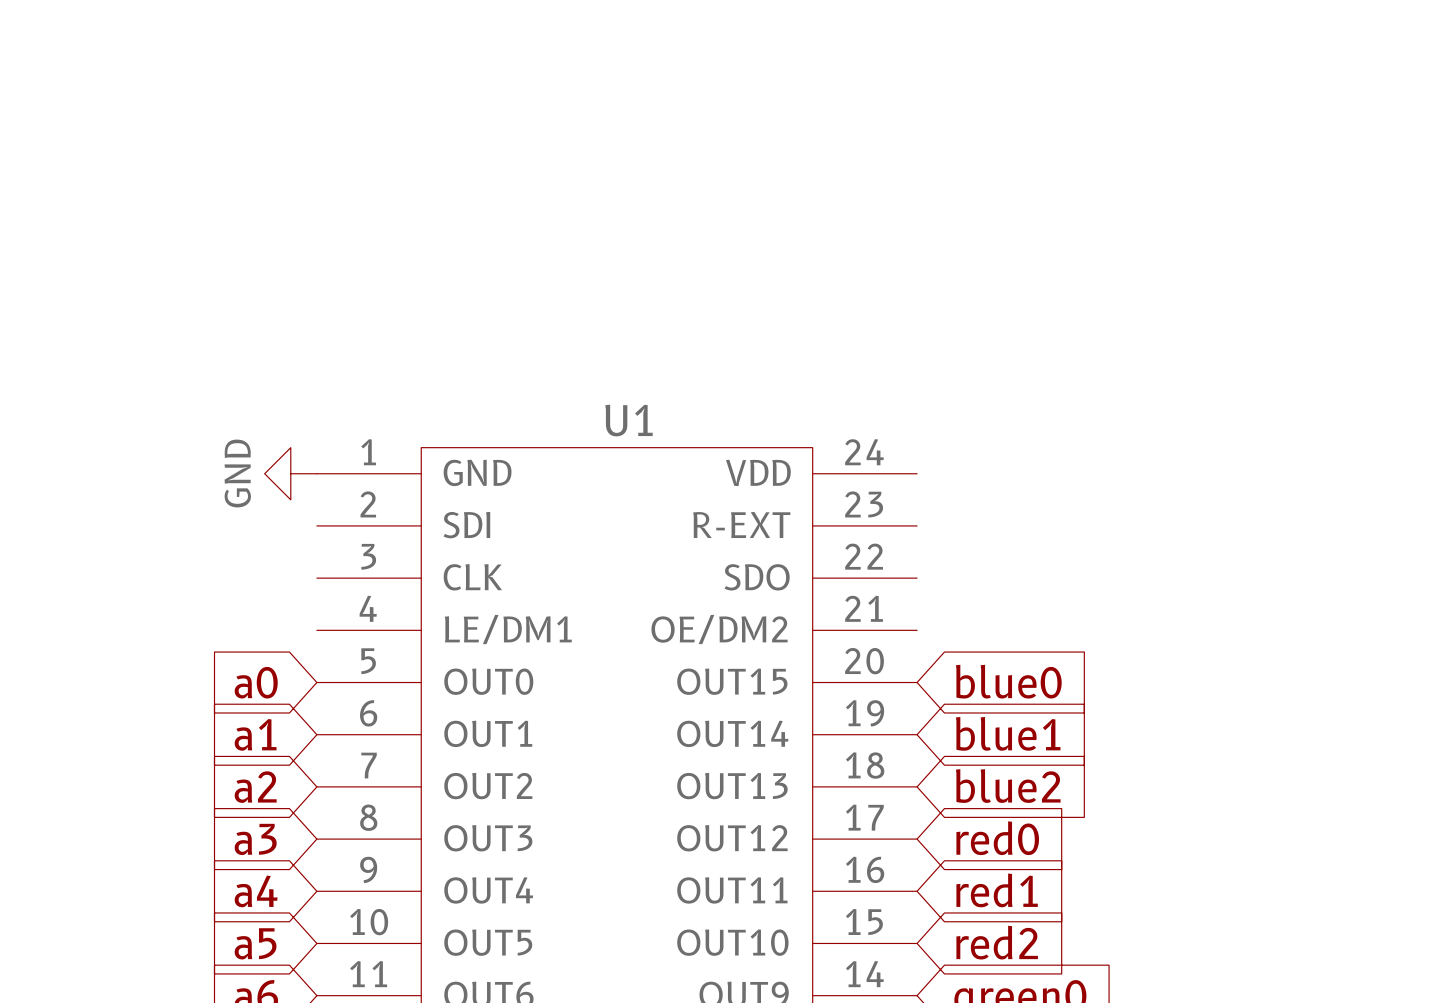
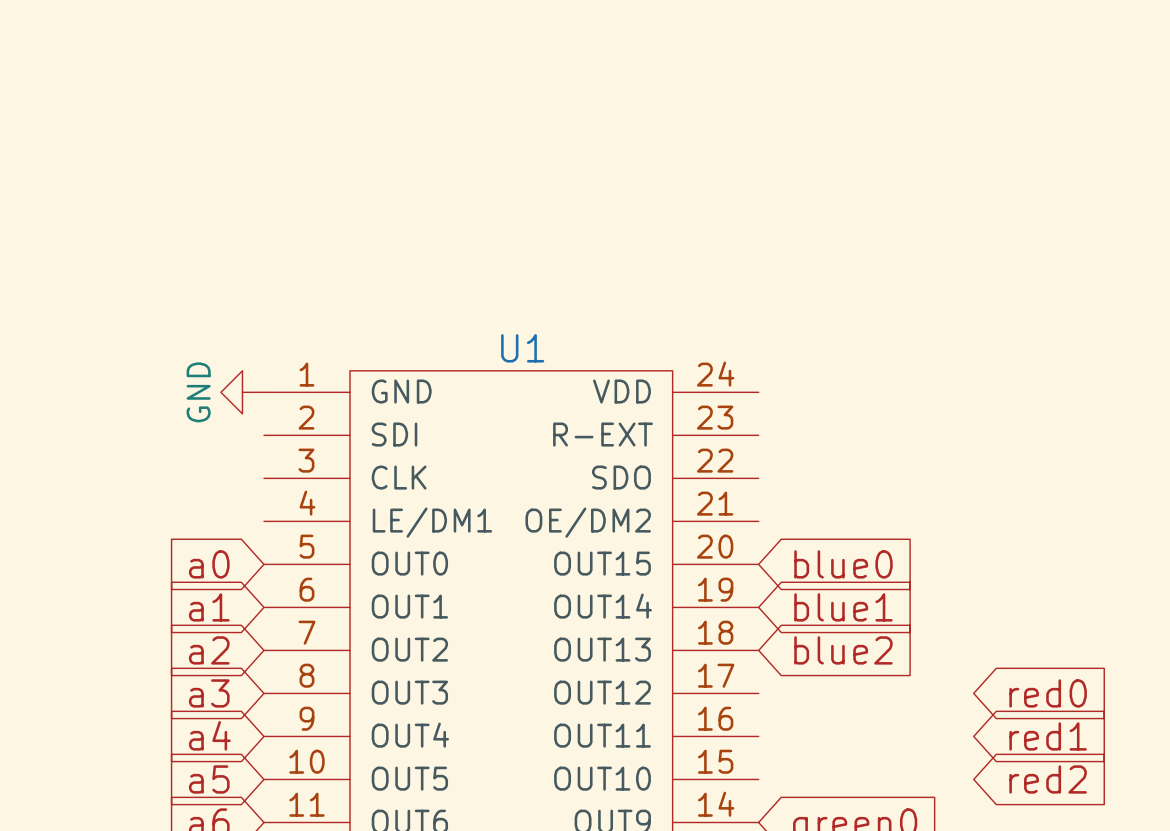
global label position: red0 (997, 838) -> red0 (1048, 693)
global label position: red1 (997, 890) -> red1 (1048, 736)
global label position: red2 (997, 942) -> red2 (1048, 779)

